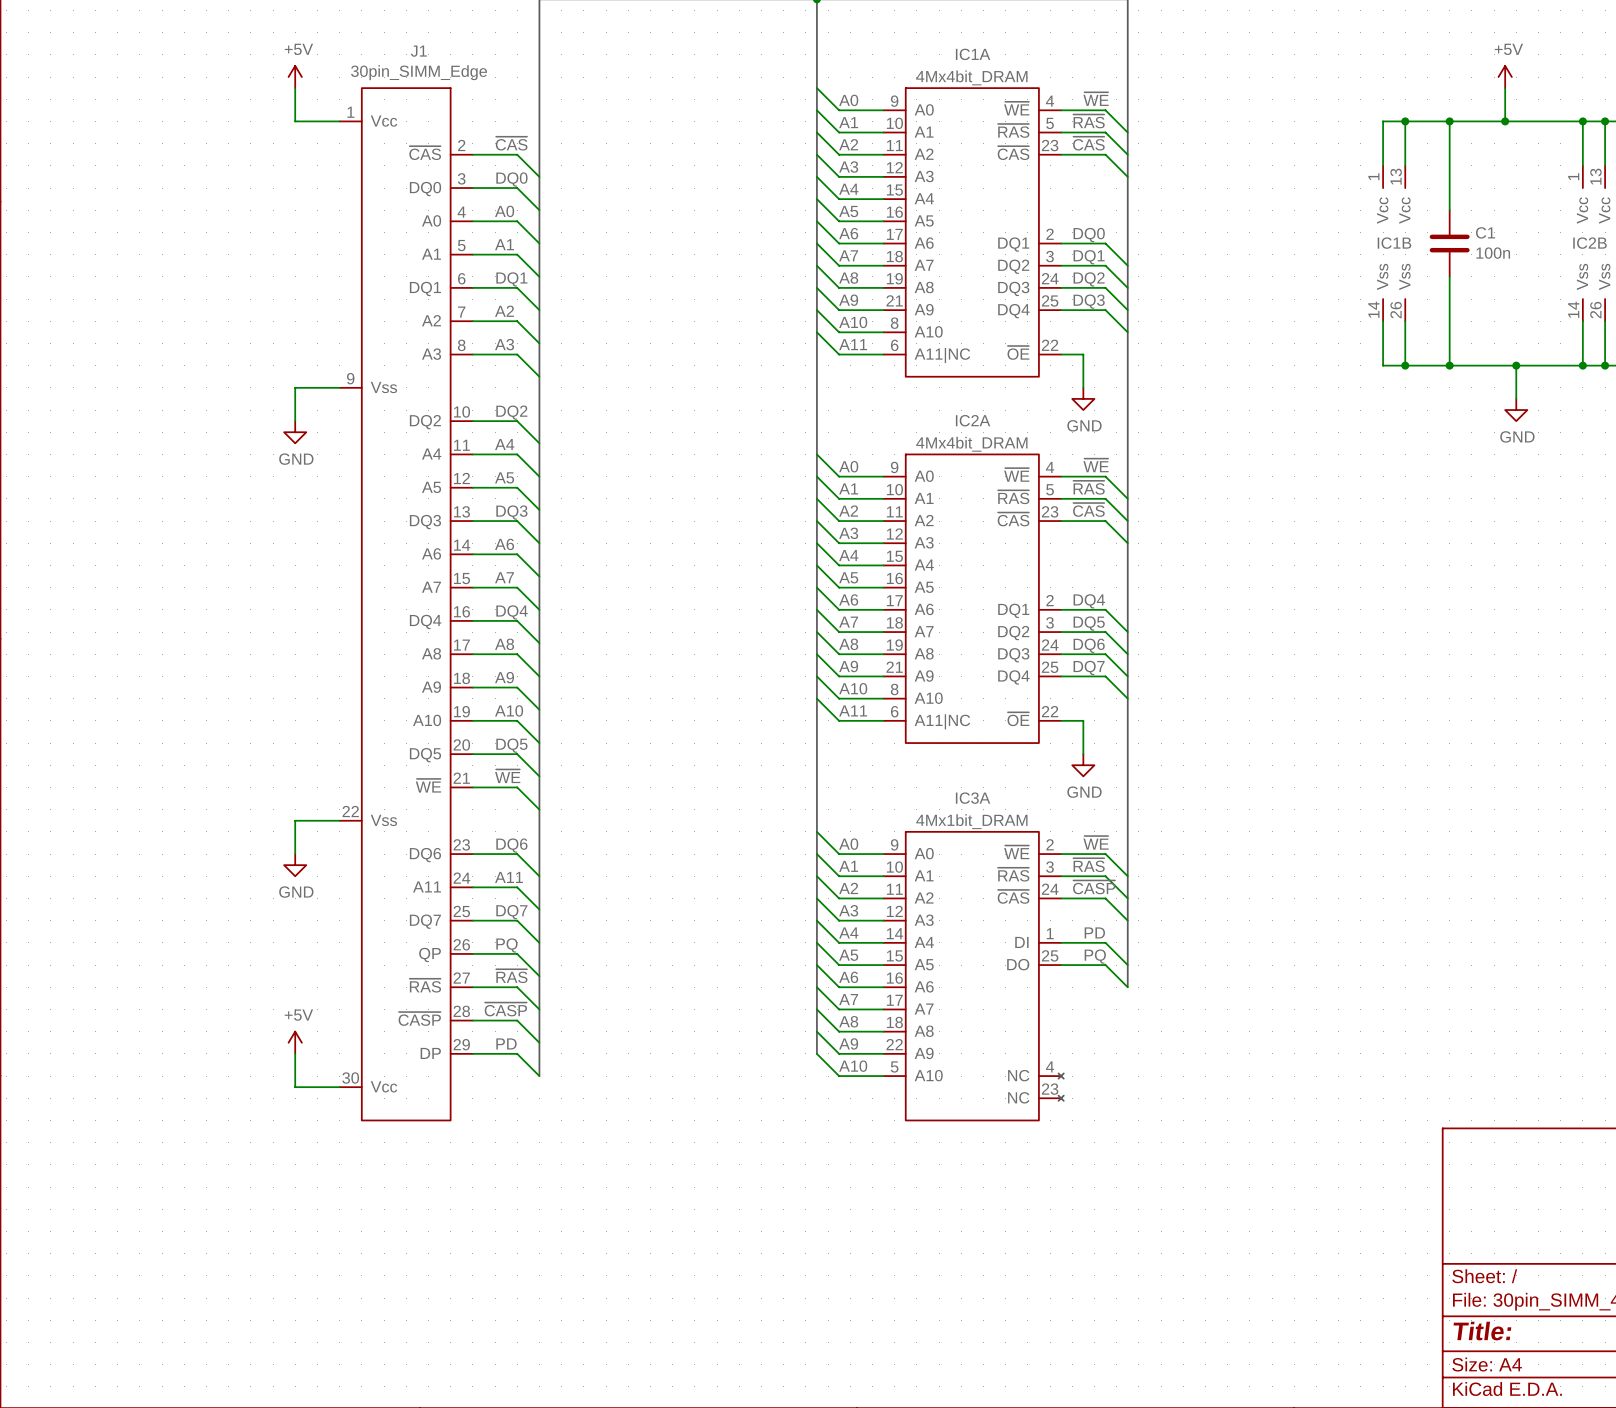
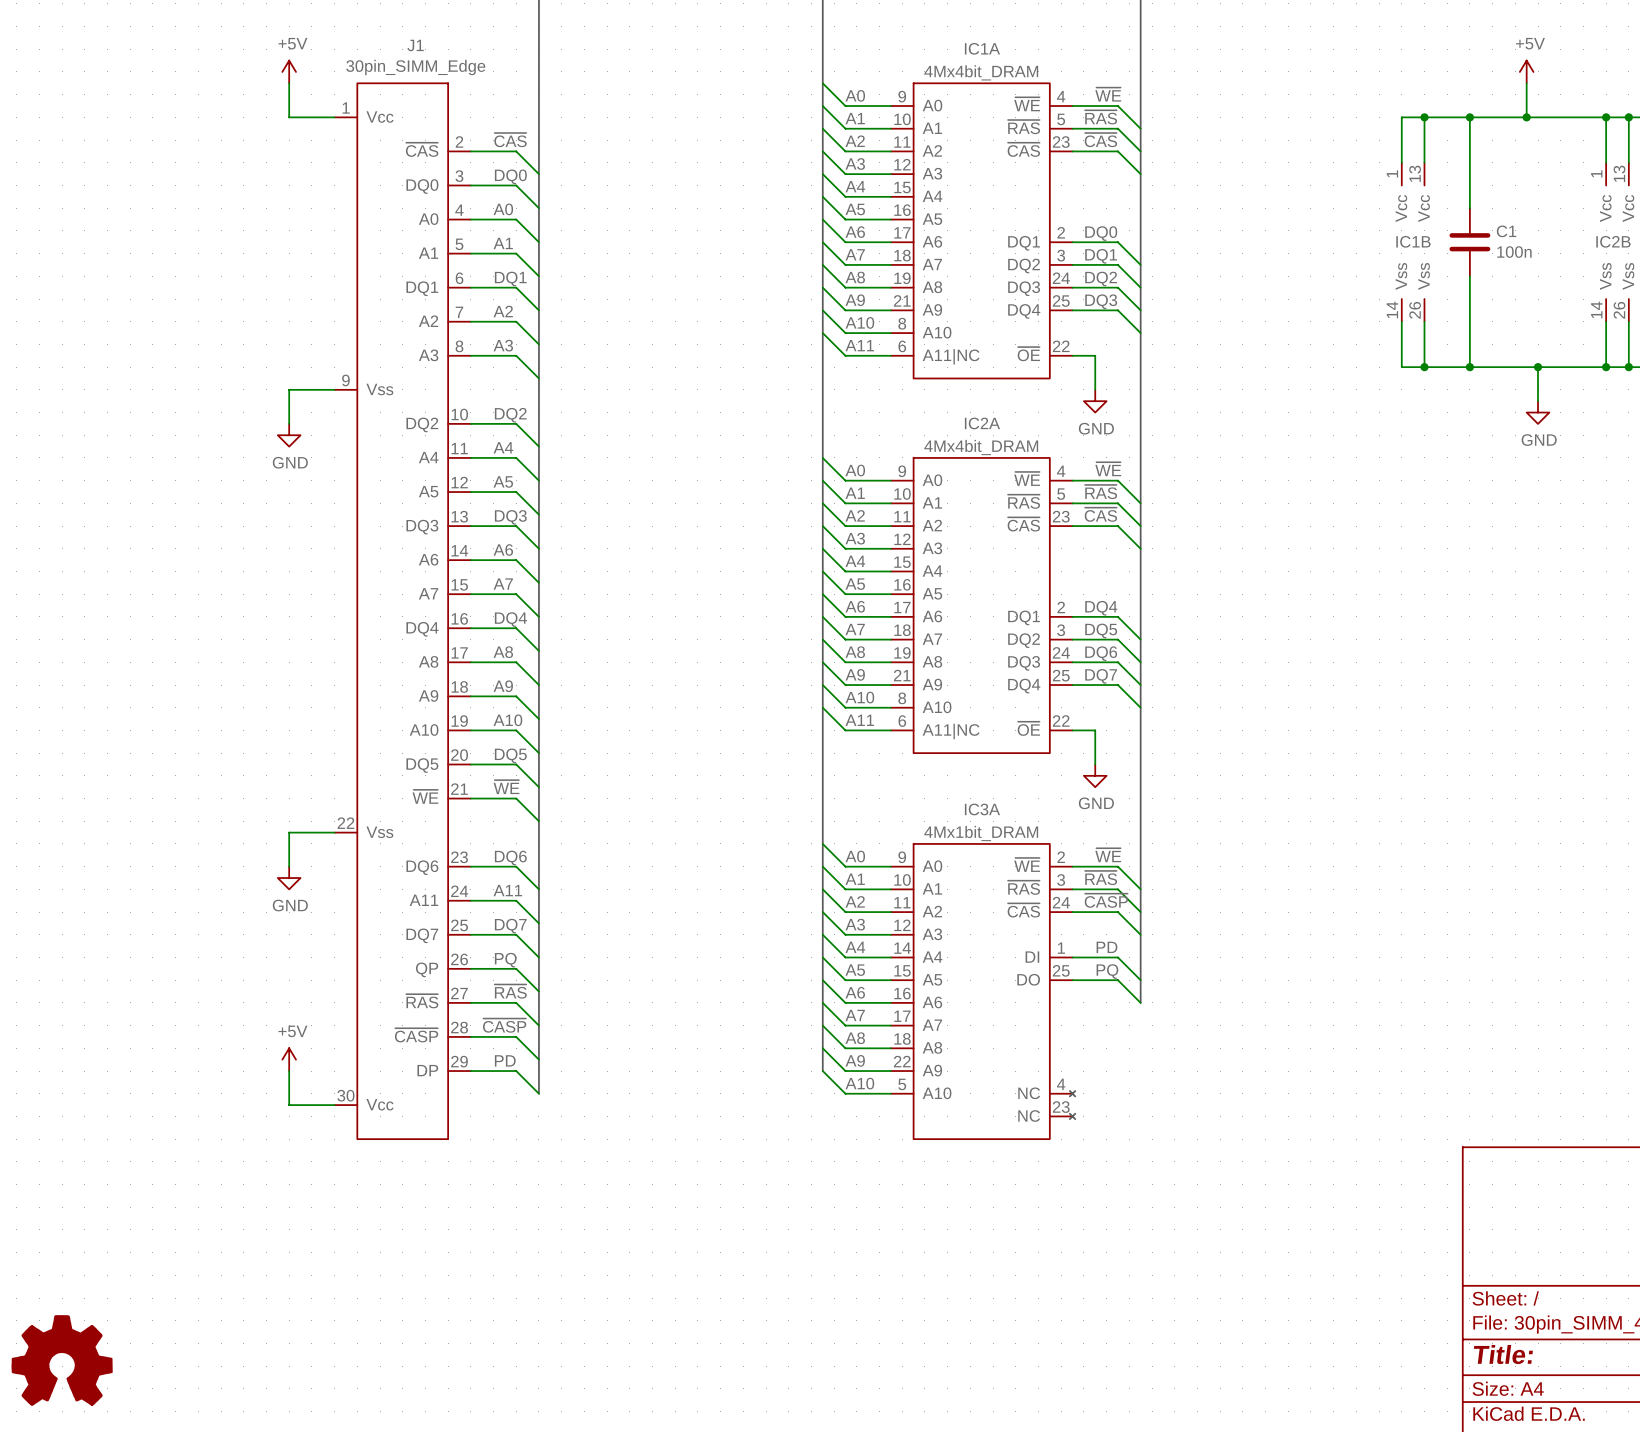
power symbol: none -> (62, 1360)

